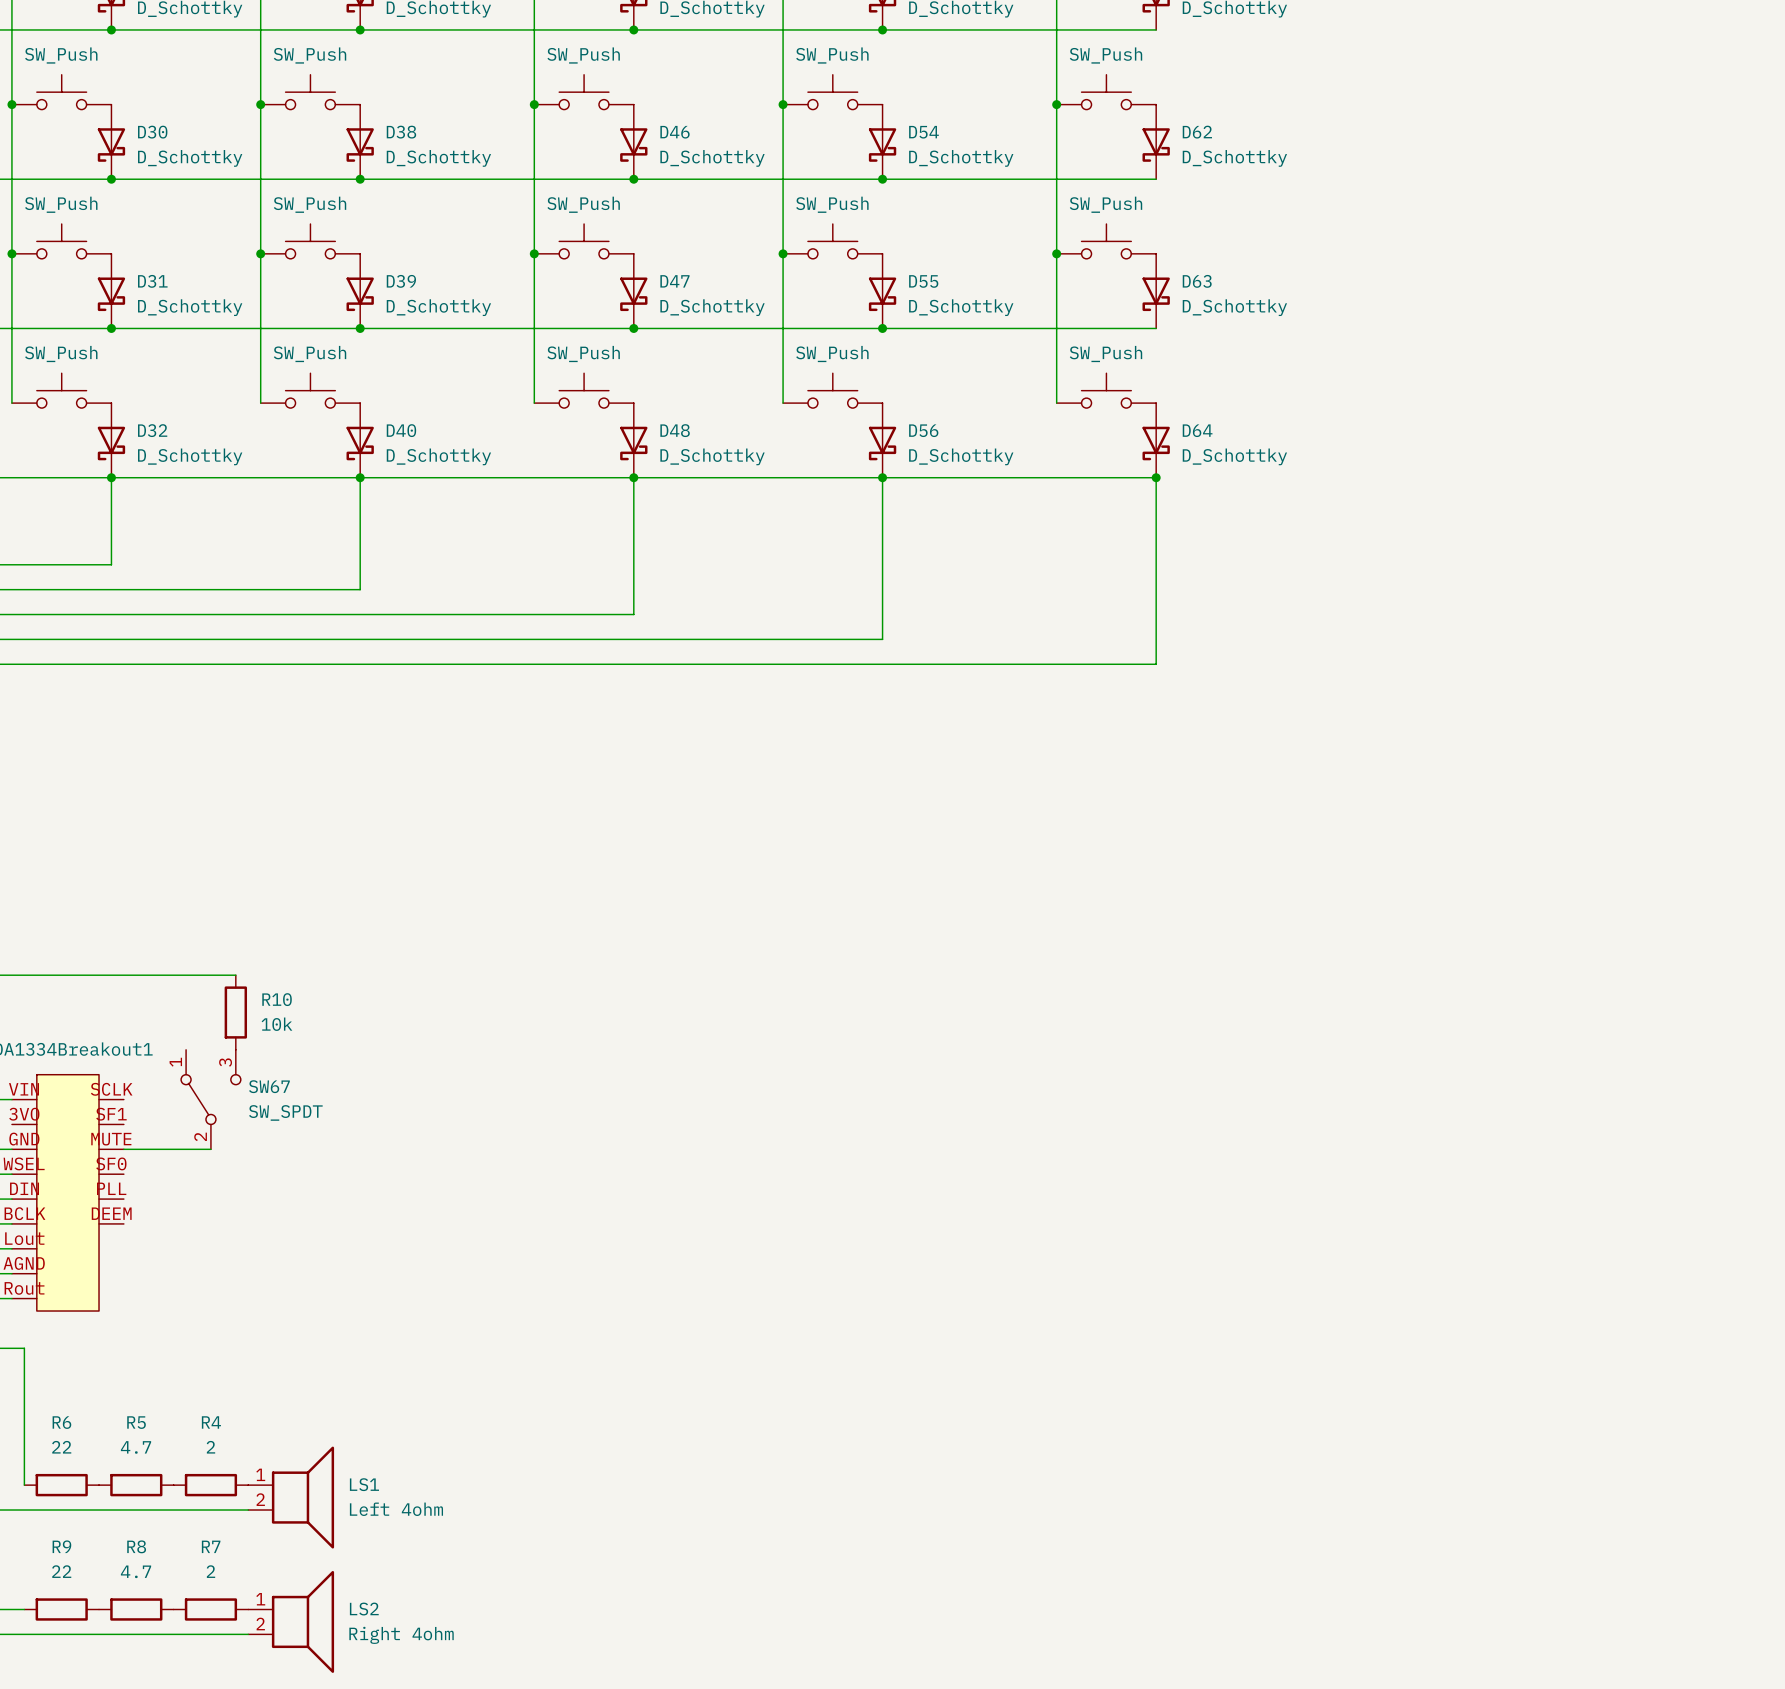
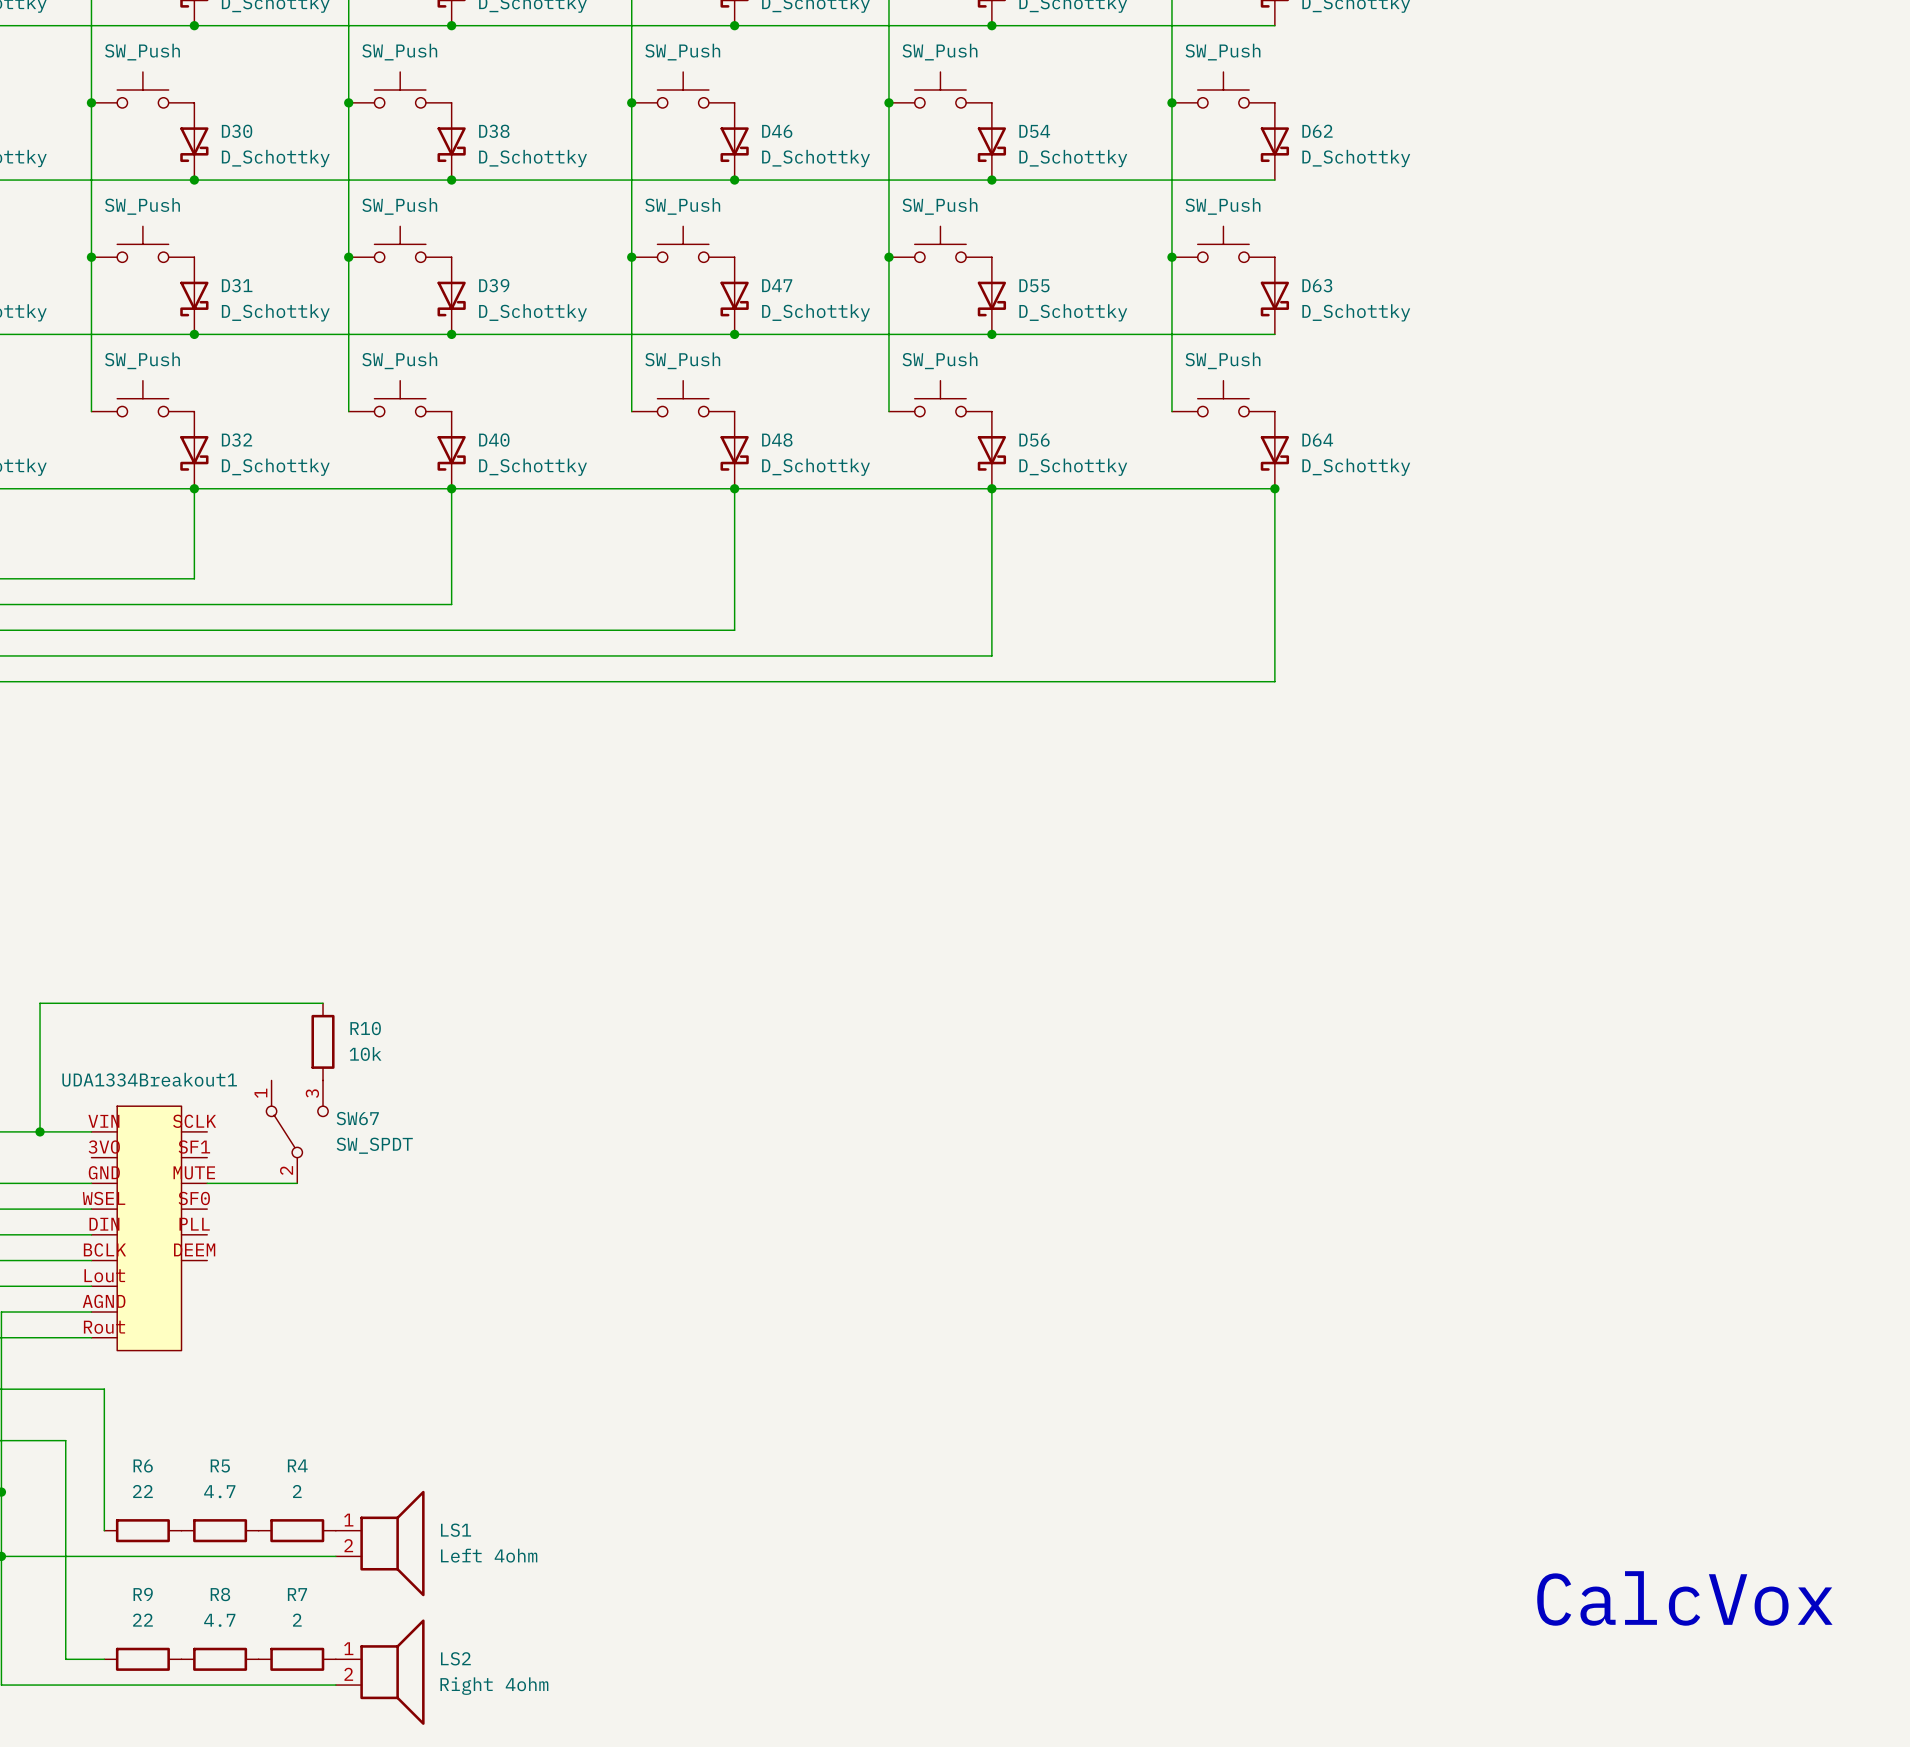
text: none -> CalcVox (1684, 1598)

